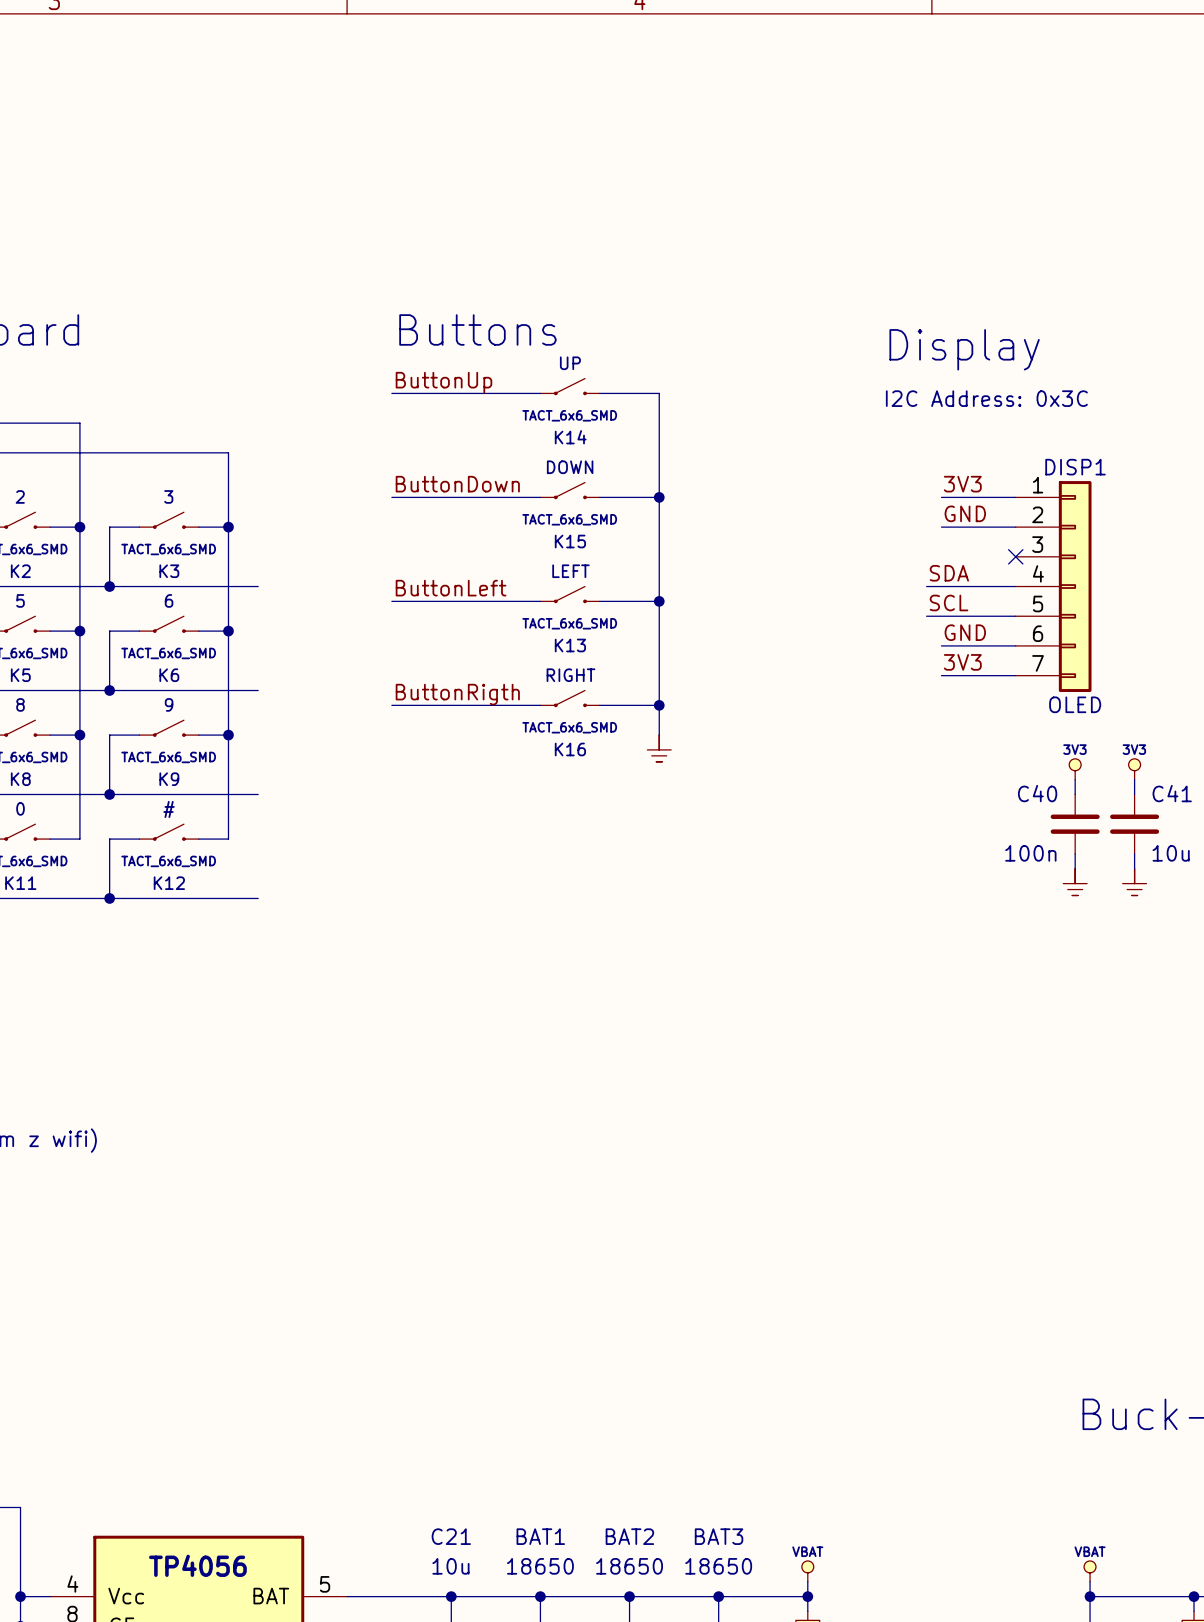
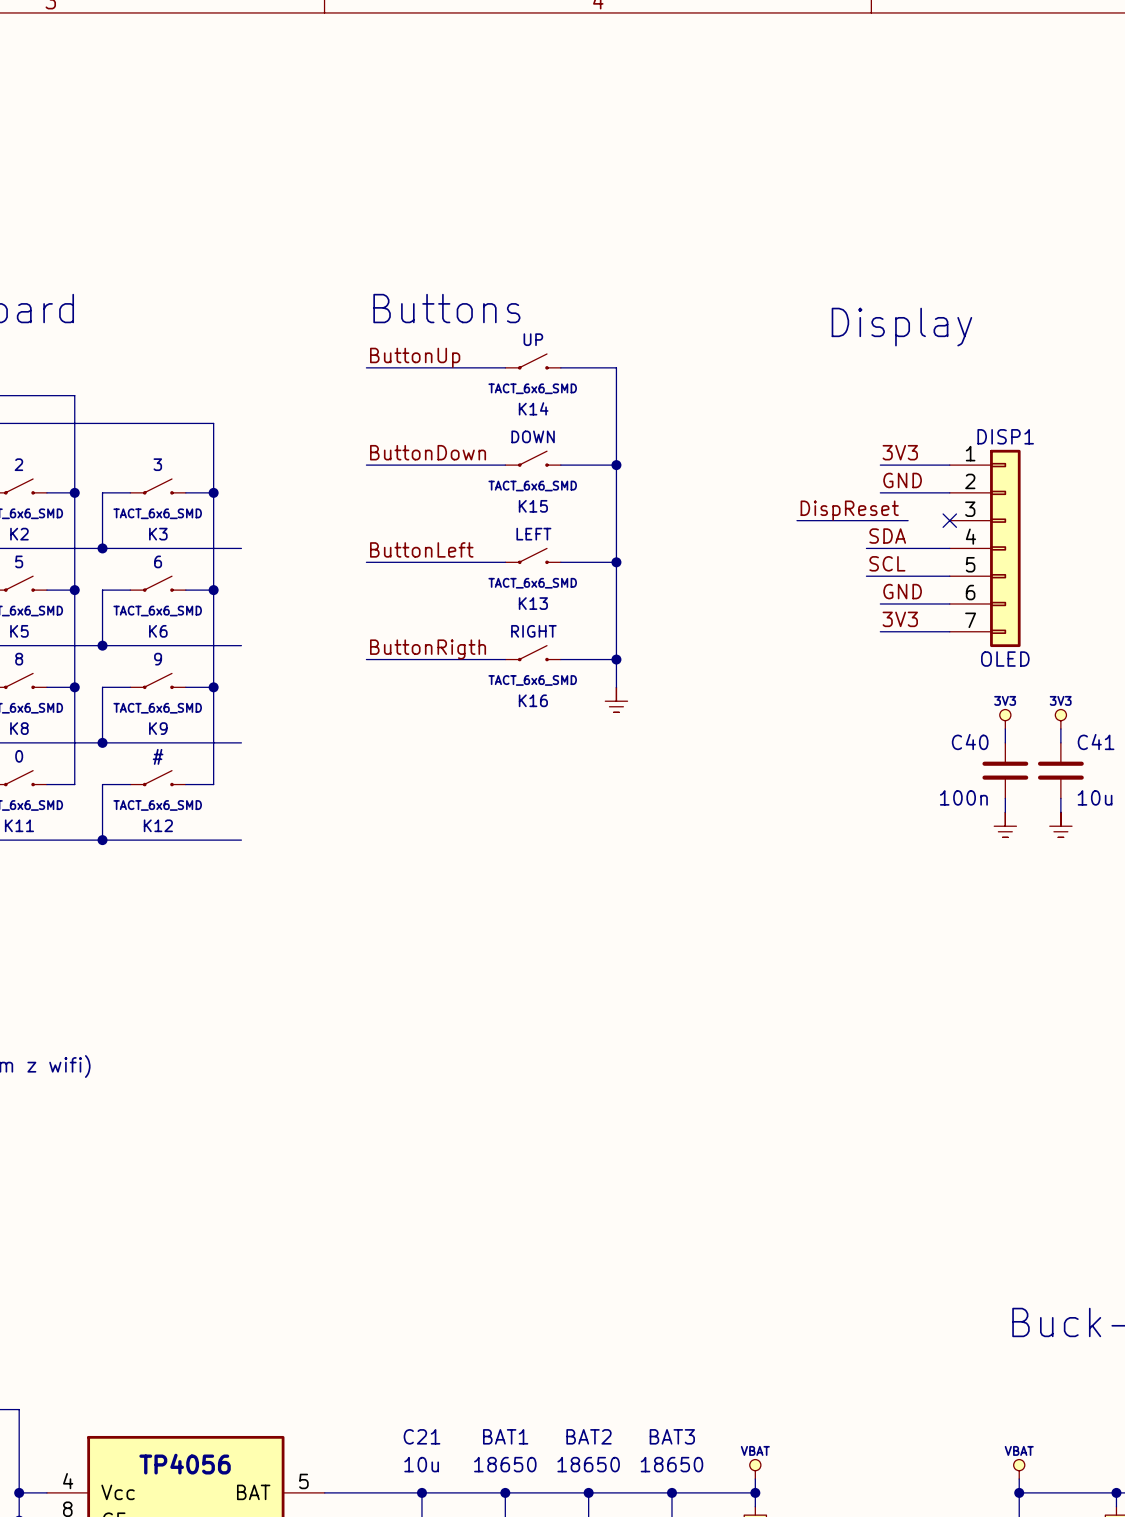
text: I2C Address: 0x3C (986, 398) -> none
label: none -> DispReset (849, 510)
wire: none -> (796, 520) (908, 520)

